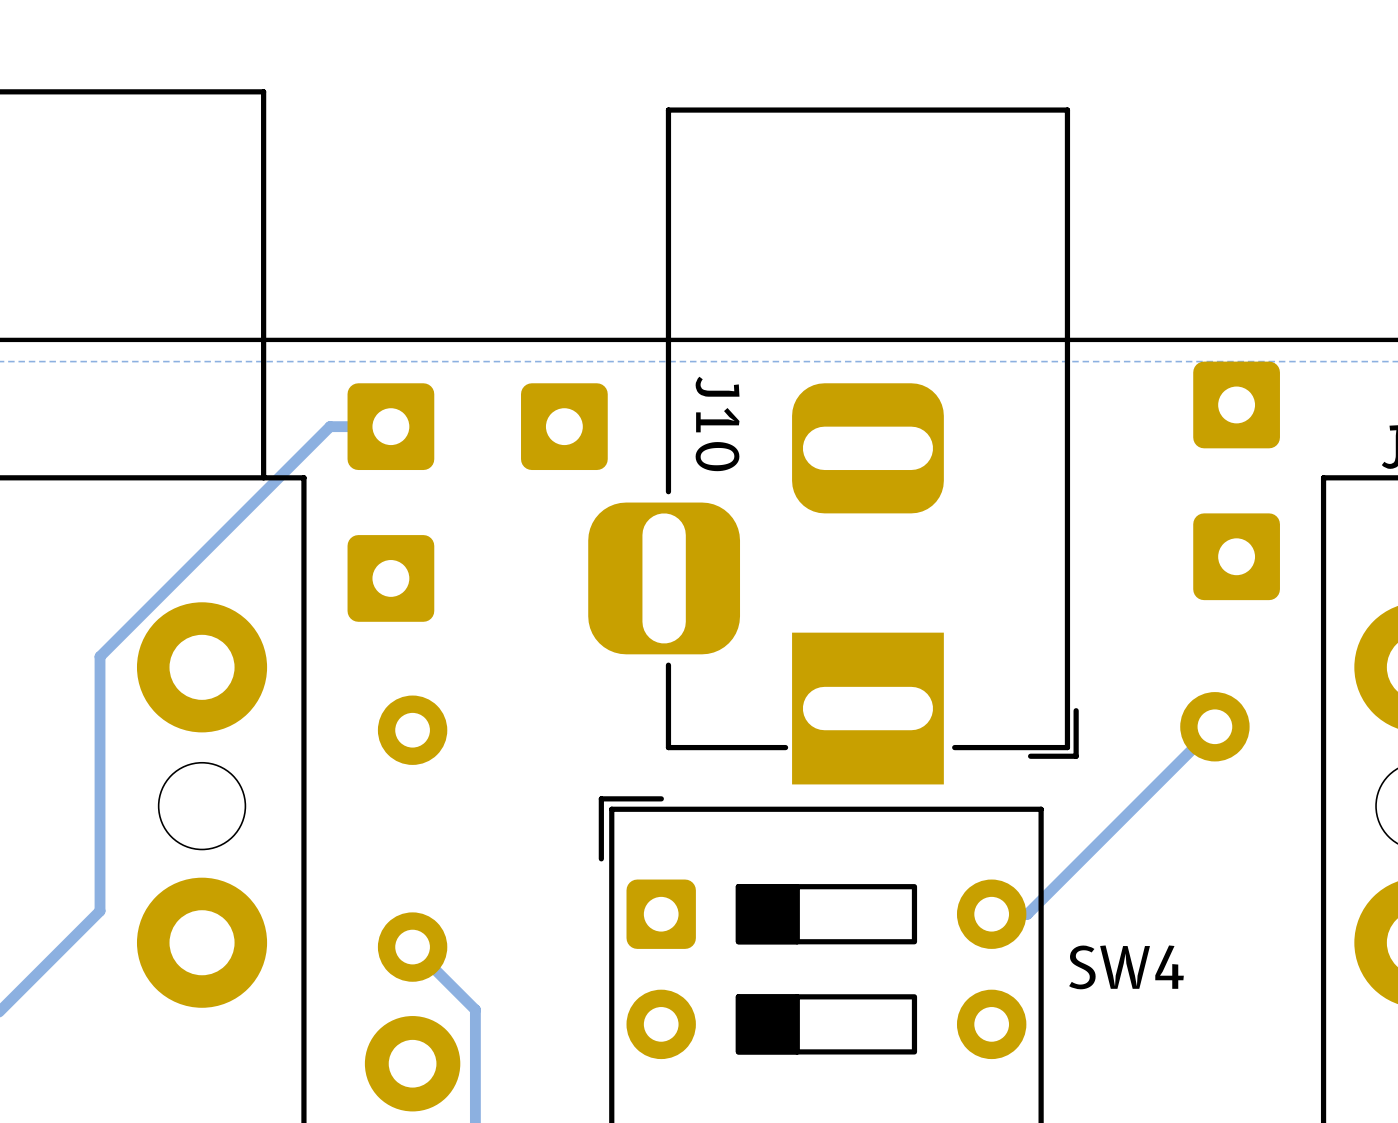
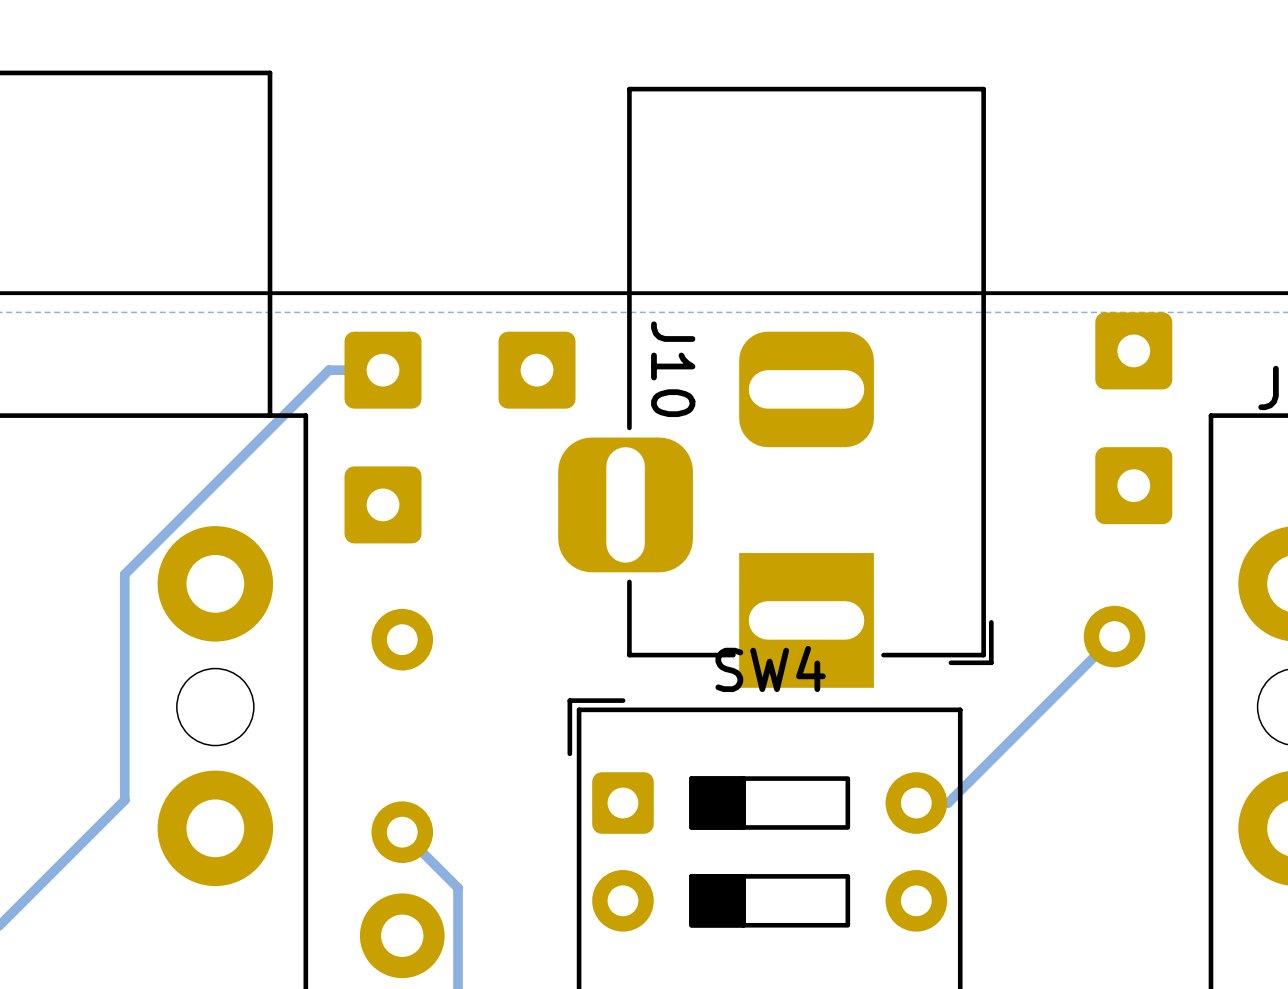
SW4 name position: SW4 (1126, 967) -> SW4 (770, 668)

